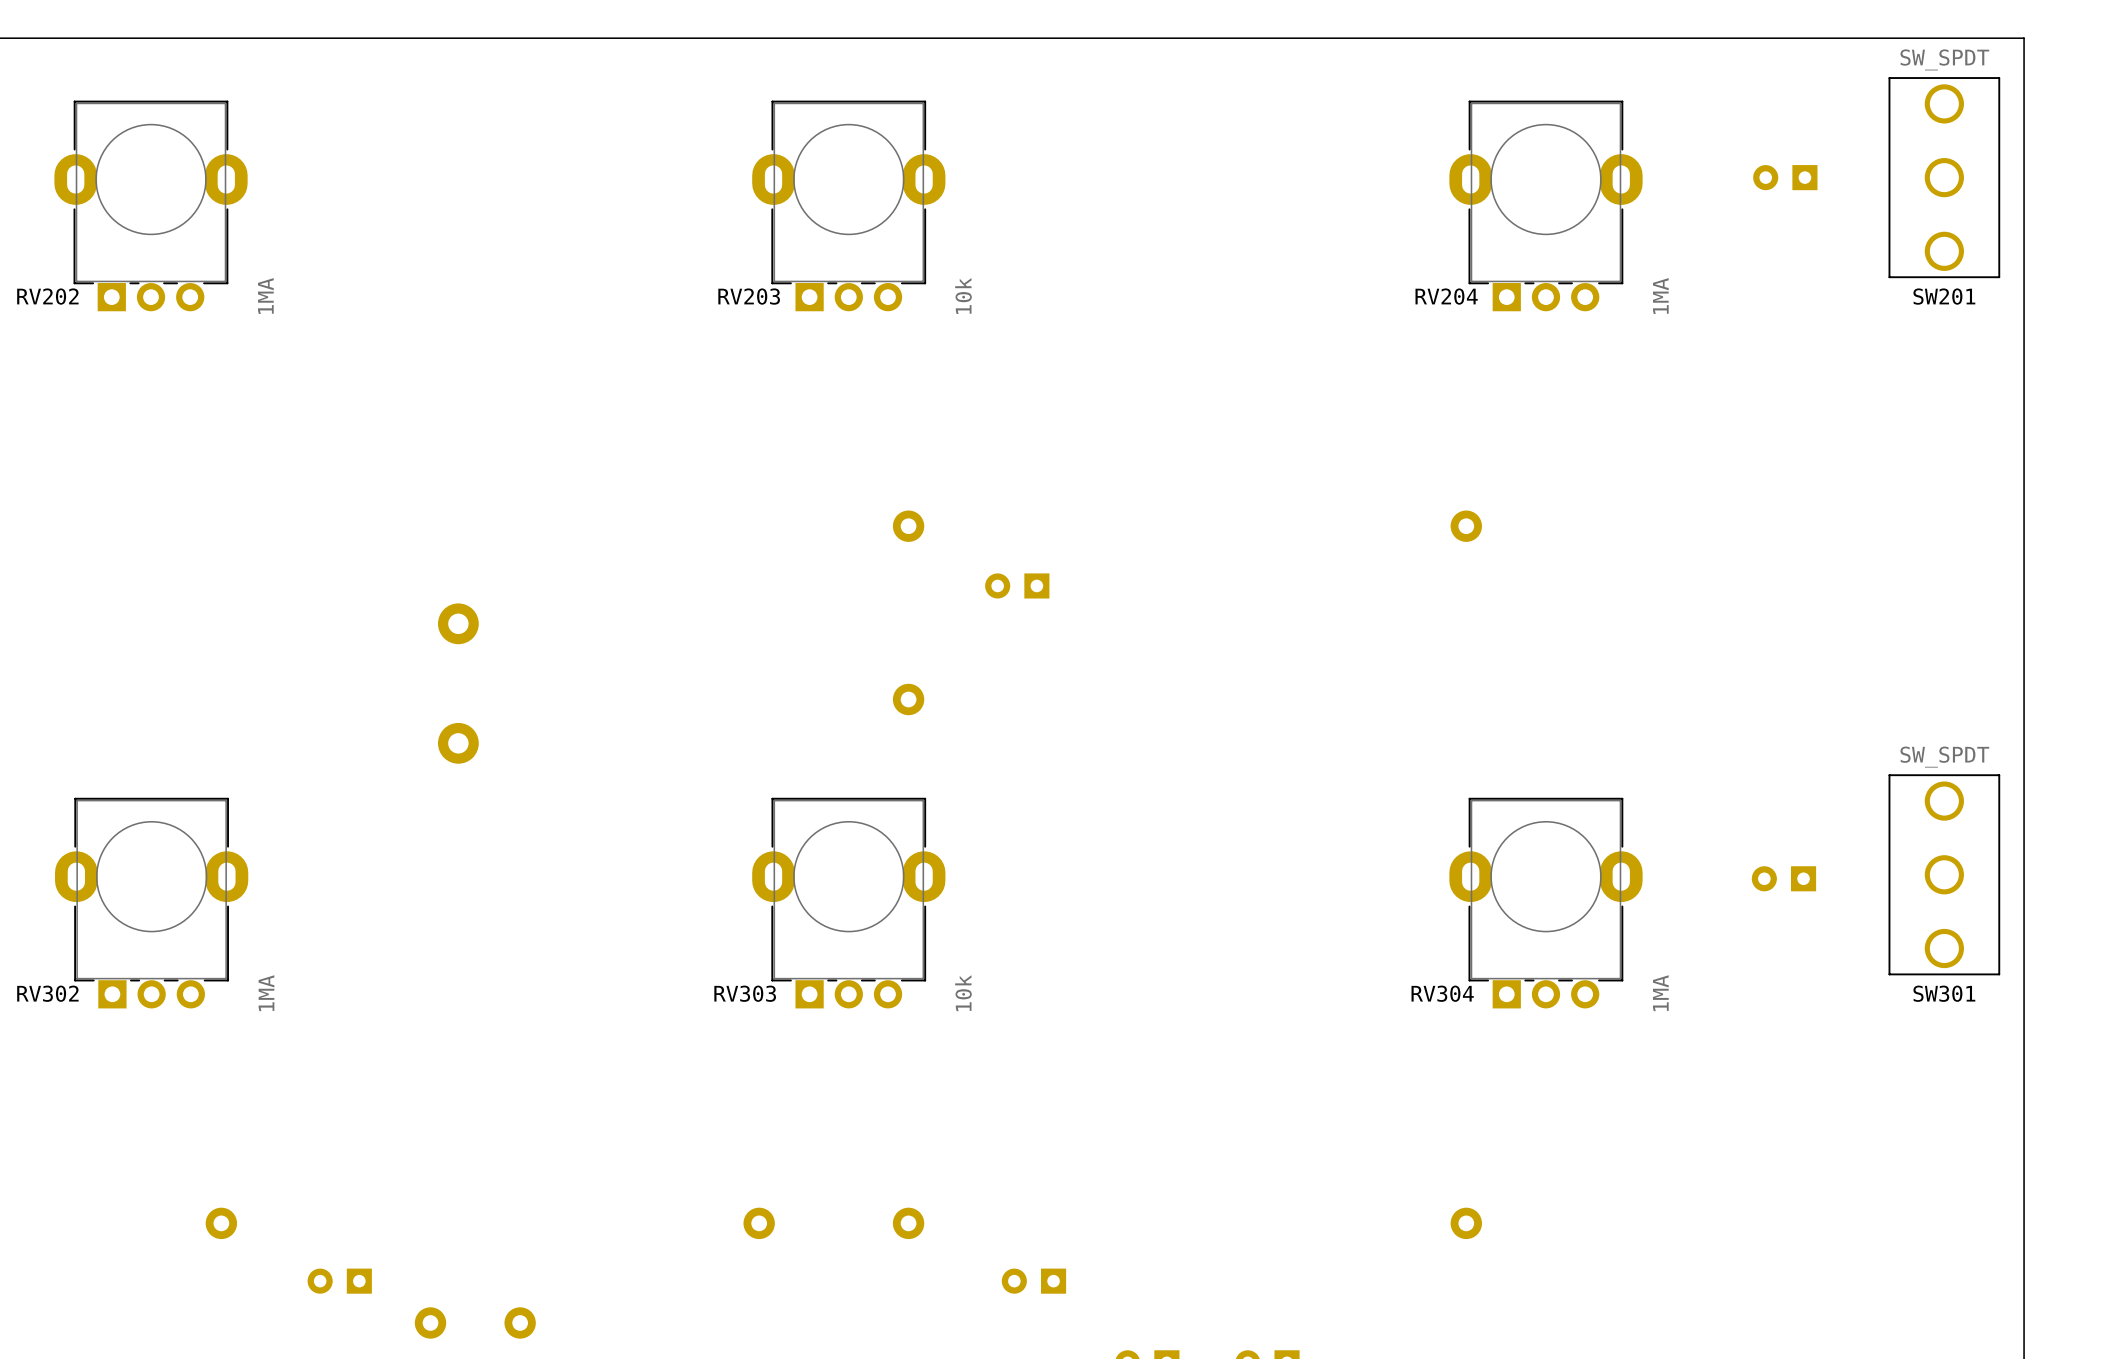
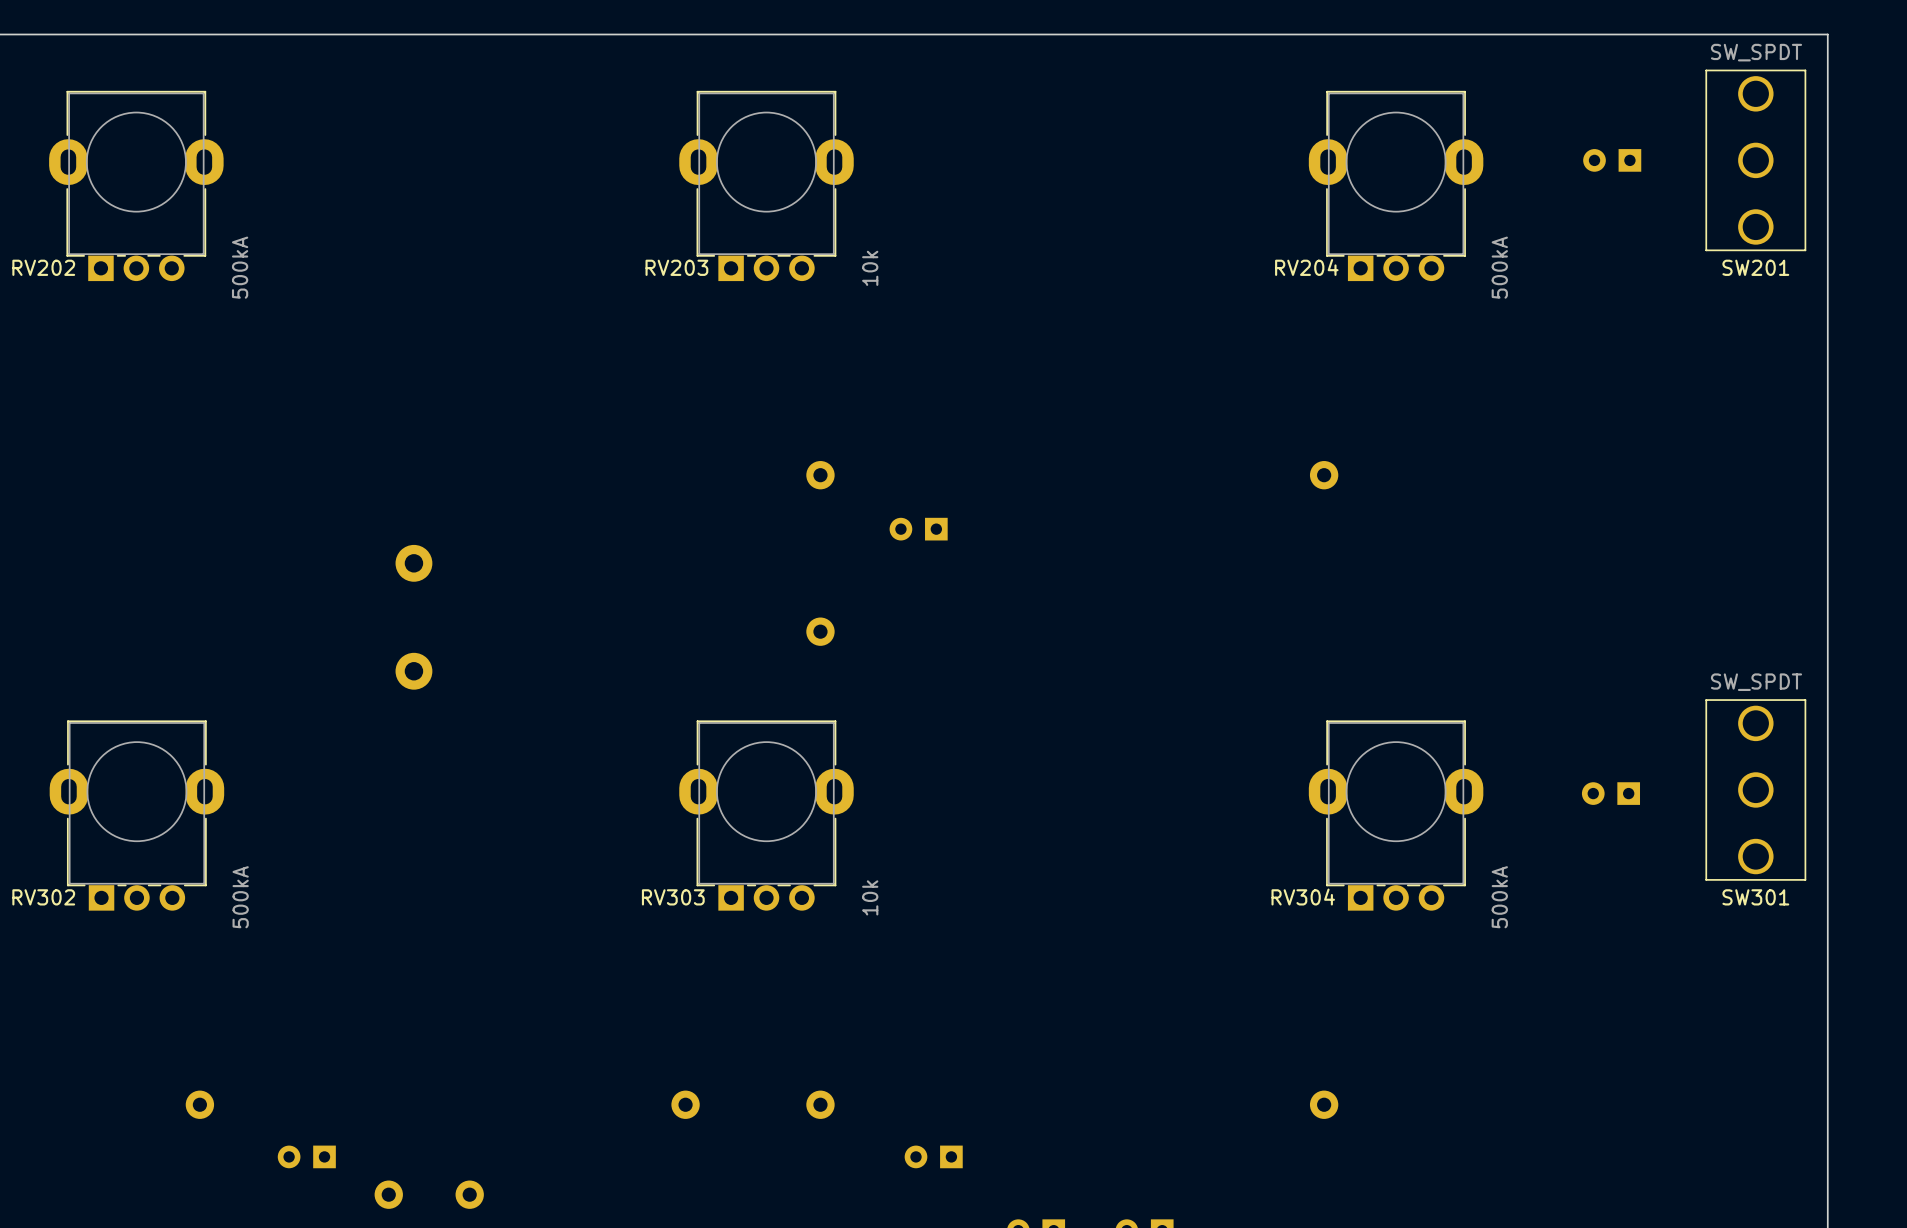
RV202 value: 1MA (265, 296) -> 500kA (240, 267)
RV204 value: 1MA (1660, 296) -> 500kA (1499, 267)
RV302 value: 1MA (266, 993) -> 500kA (240, 897)
RV304 value: 1MA (1660, 993) -> 500kA (1499, 897)

